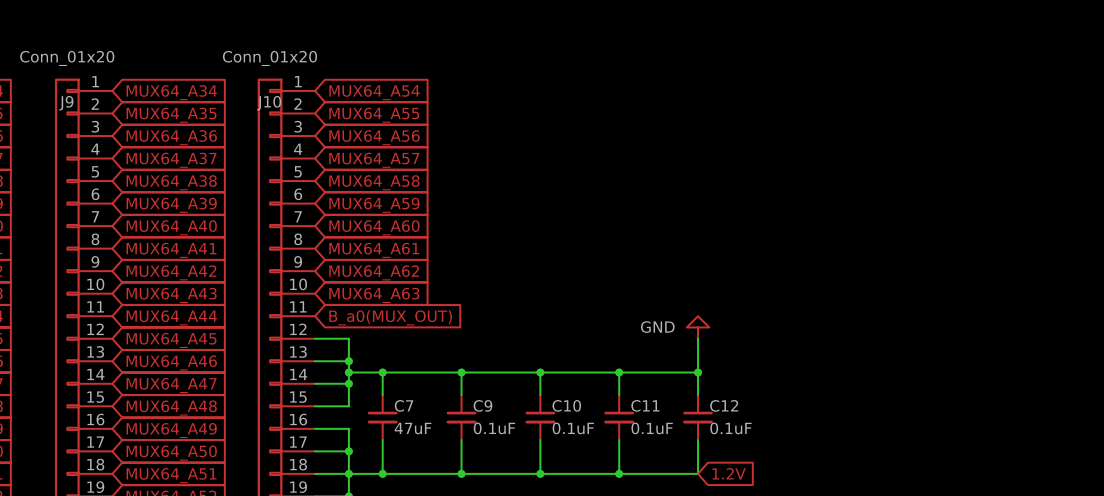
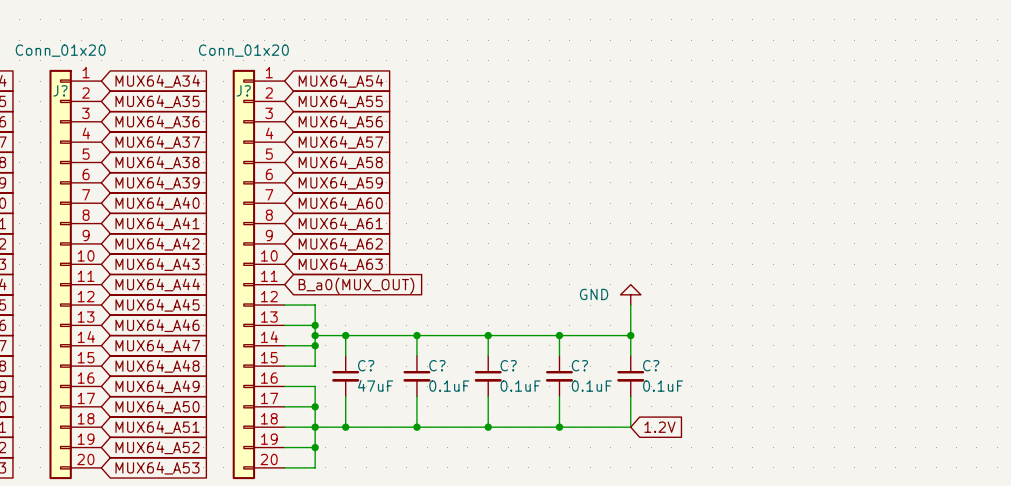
J9 name: J9 (66, 103) -> J? (60, 90)
J10 name: J10 (269, 103) -> J? (243, 90)
C7 name: C7 (404, 405) -> C? (366, 365)
C9 name: C9 (482, 405) -> C? (437, 365)
C10 name: C10 (566, 405) -> C? (508, 365)
C11 name: C11 (645, 405) -> C? (579, 365)
C12 name: C12 (724, 405) -> C? (651, 365)

